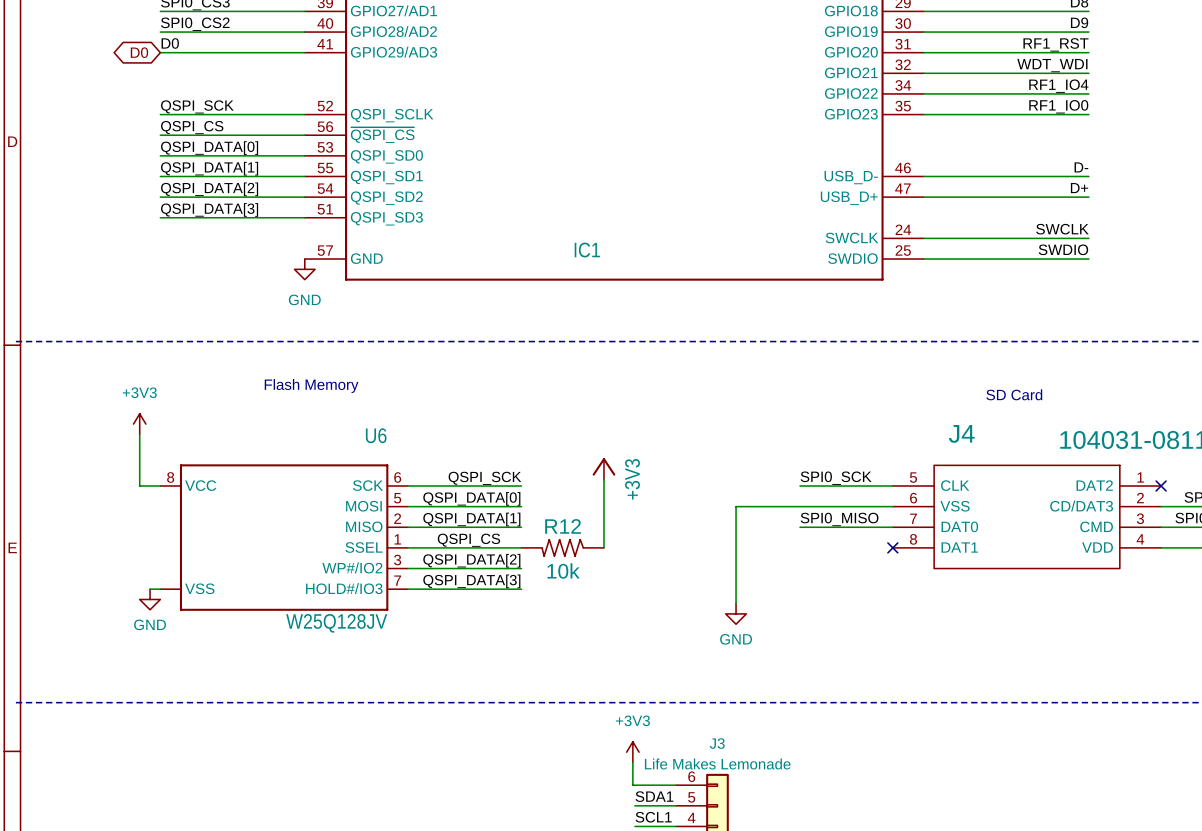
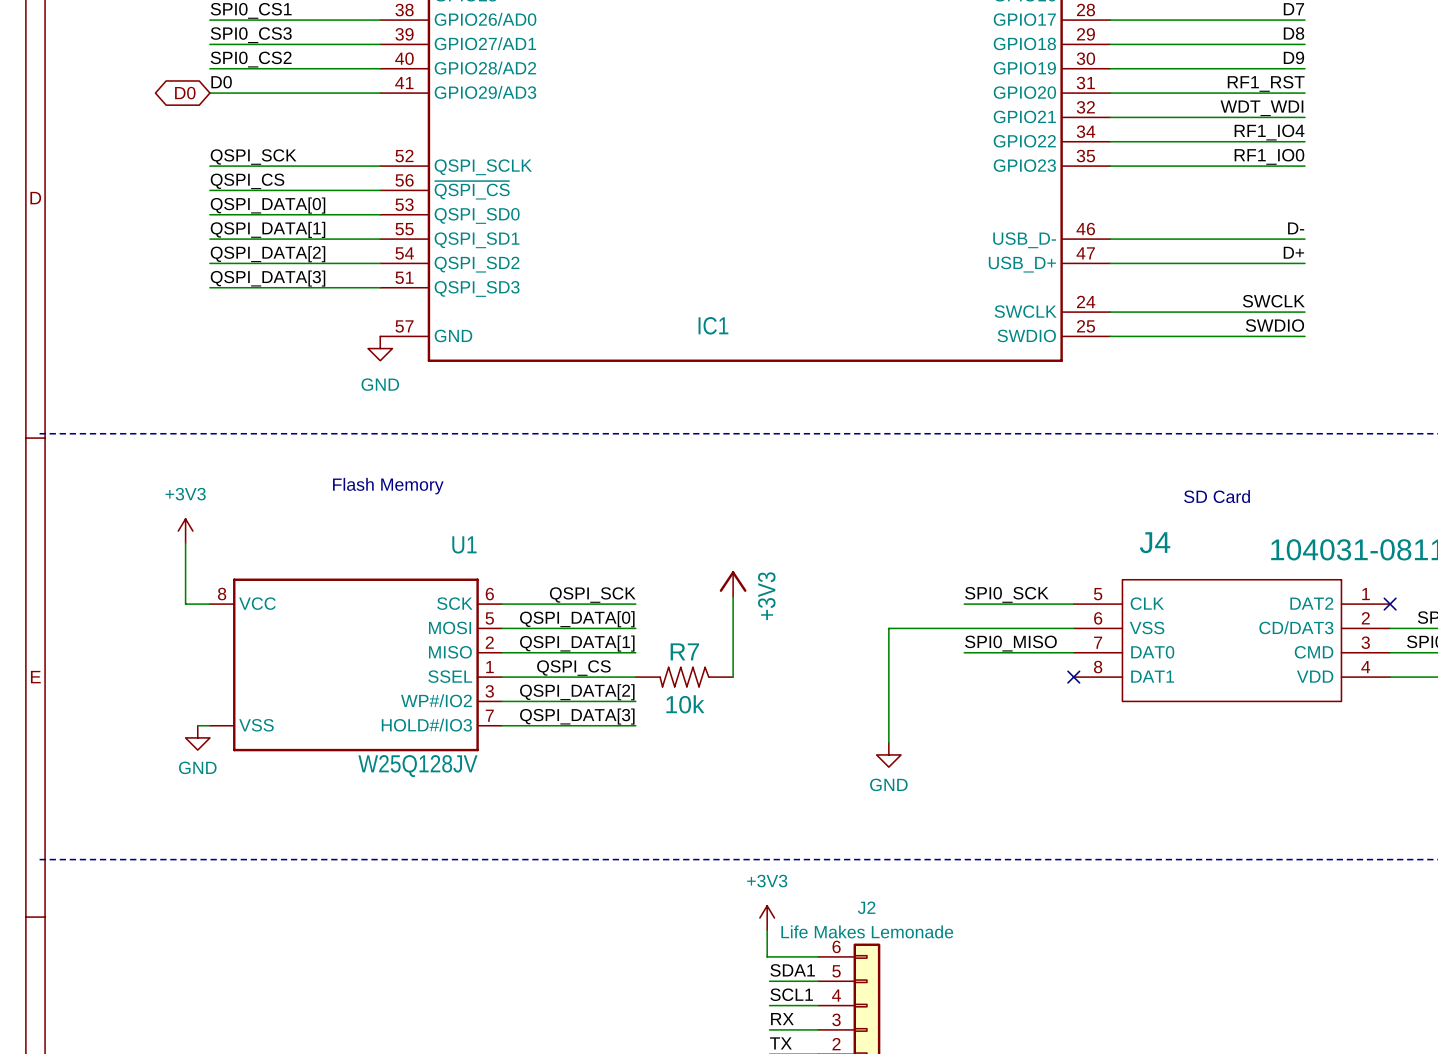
U6 name: U6 (376, 435) -> U1 (464, 544)
R12 name: R12 (563, 526) -> R7 (684, 651)
J3 name: J3 (717, 743) -> J2 (866, 907)

